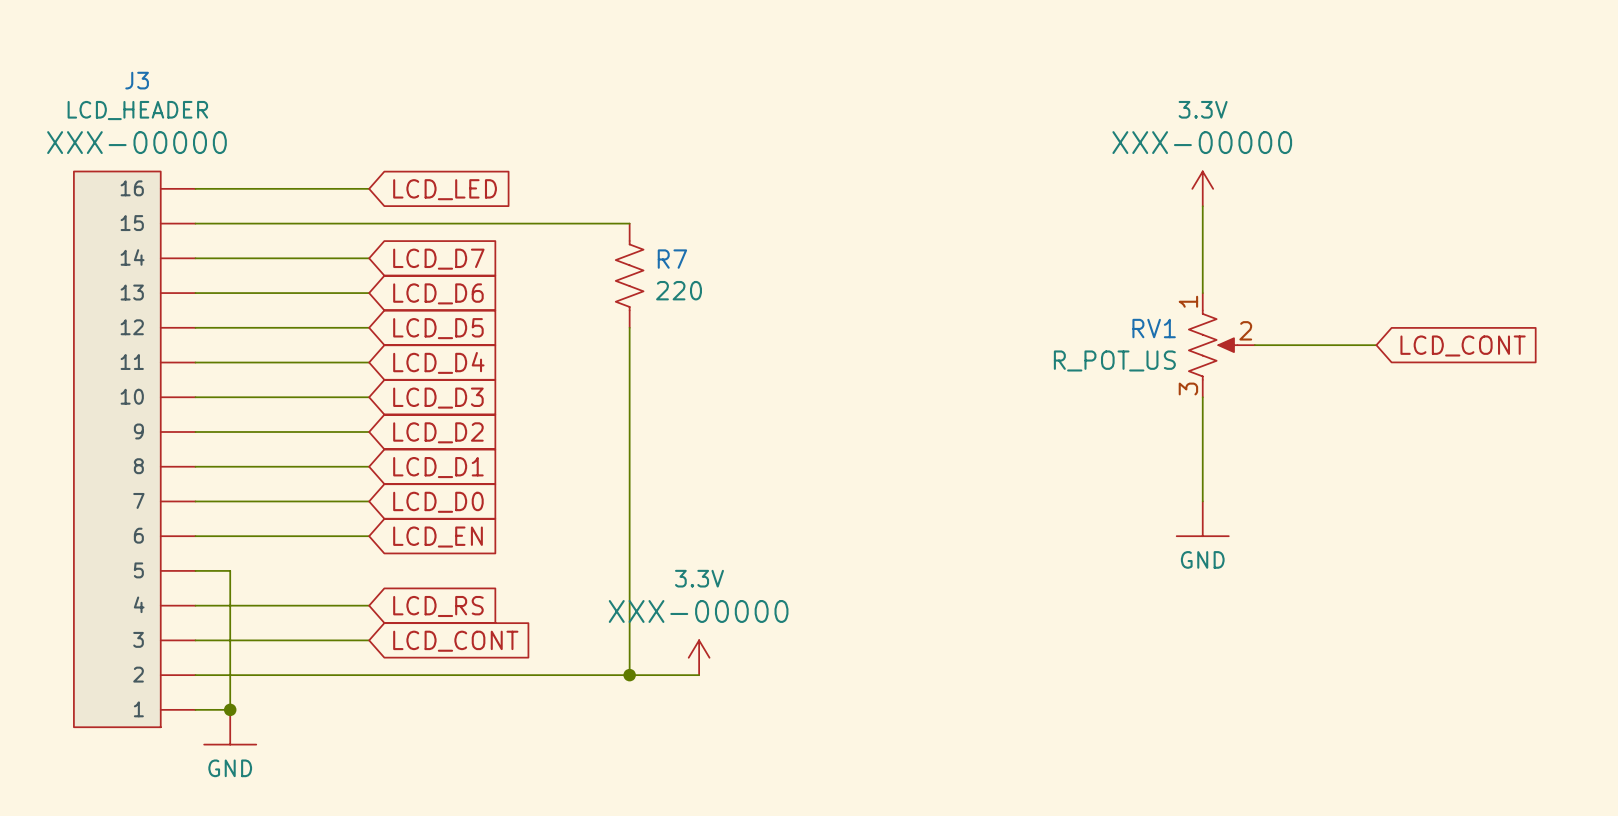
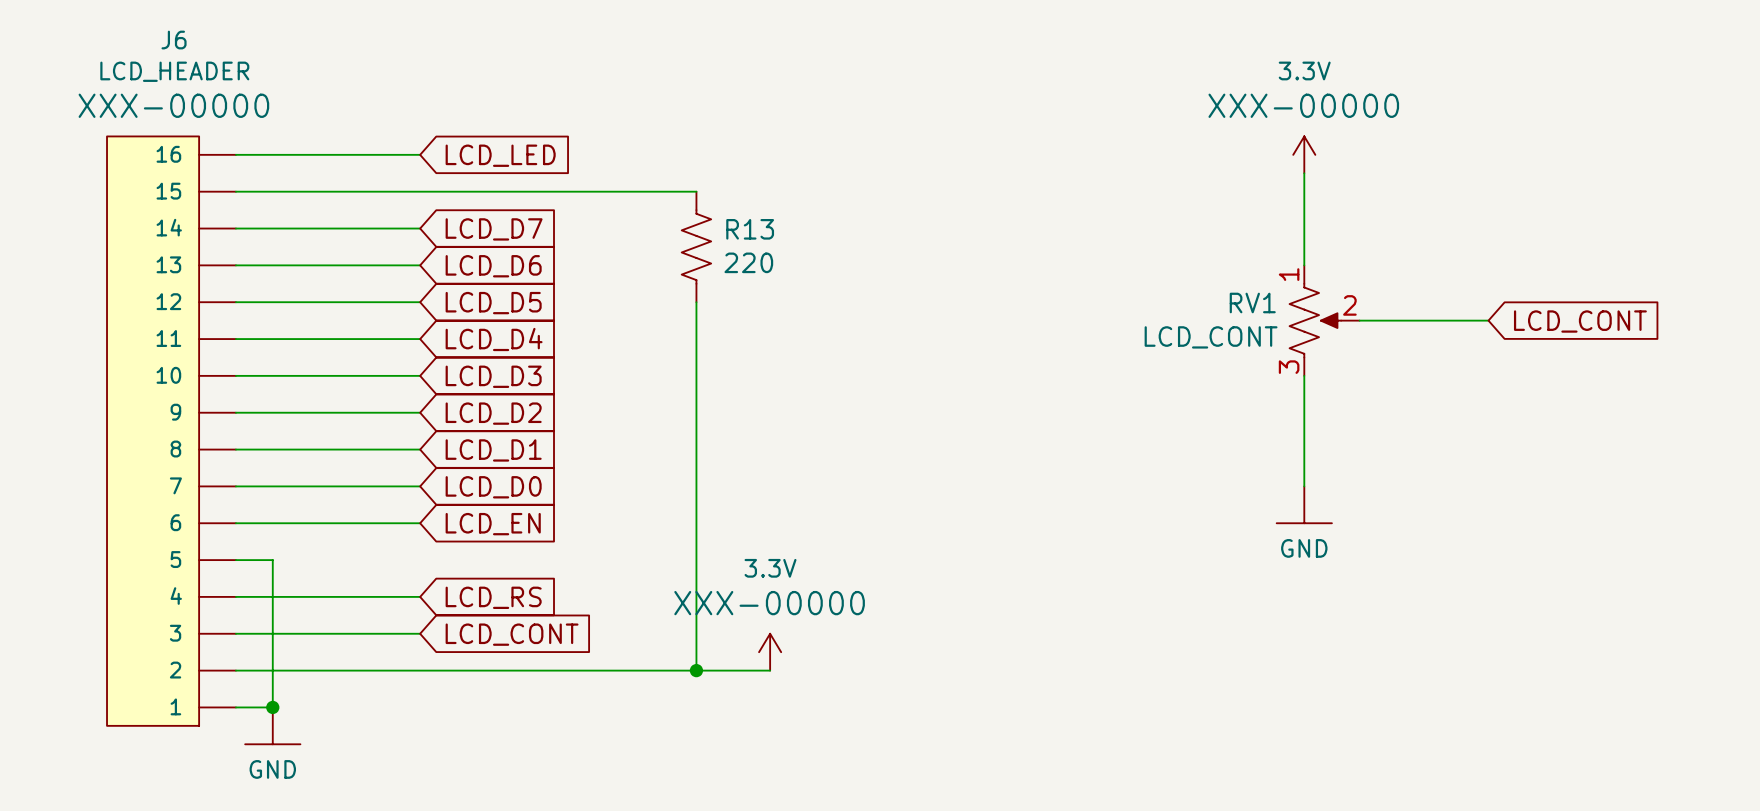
J3 name: J3 (137, 80) -> J6 (174, 40)
R7 name: R7 (672, 259) -> R13 (750, 229)
RV1 value: R_POT_US (1114, 360) -> LCD_CONT (1211, 337)

